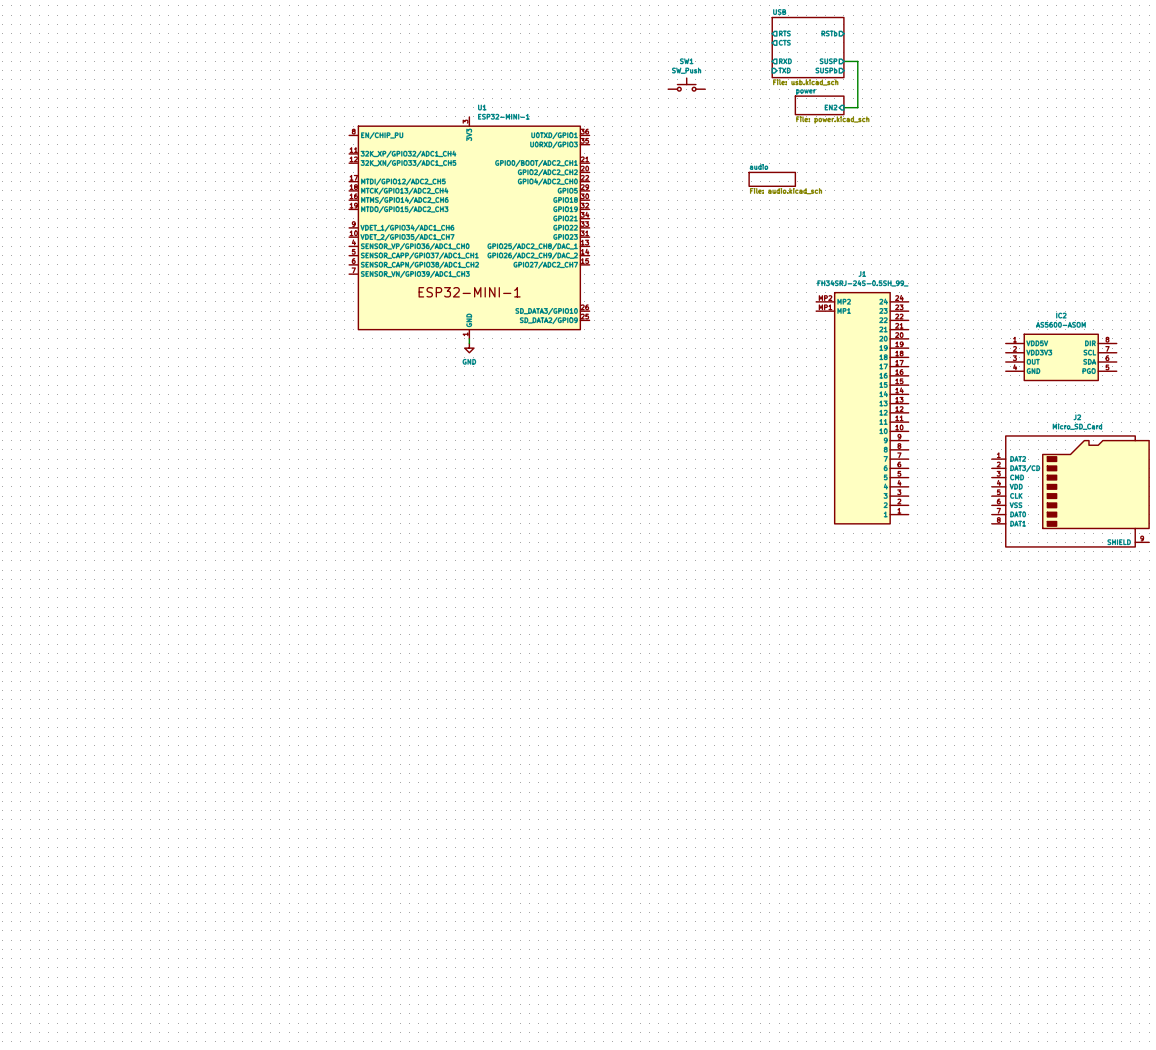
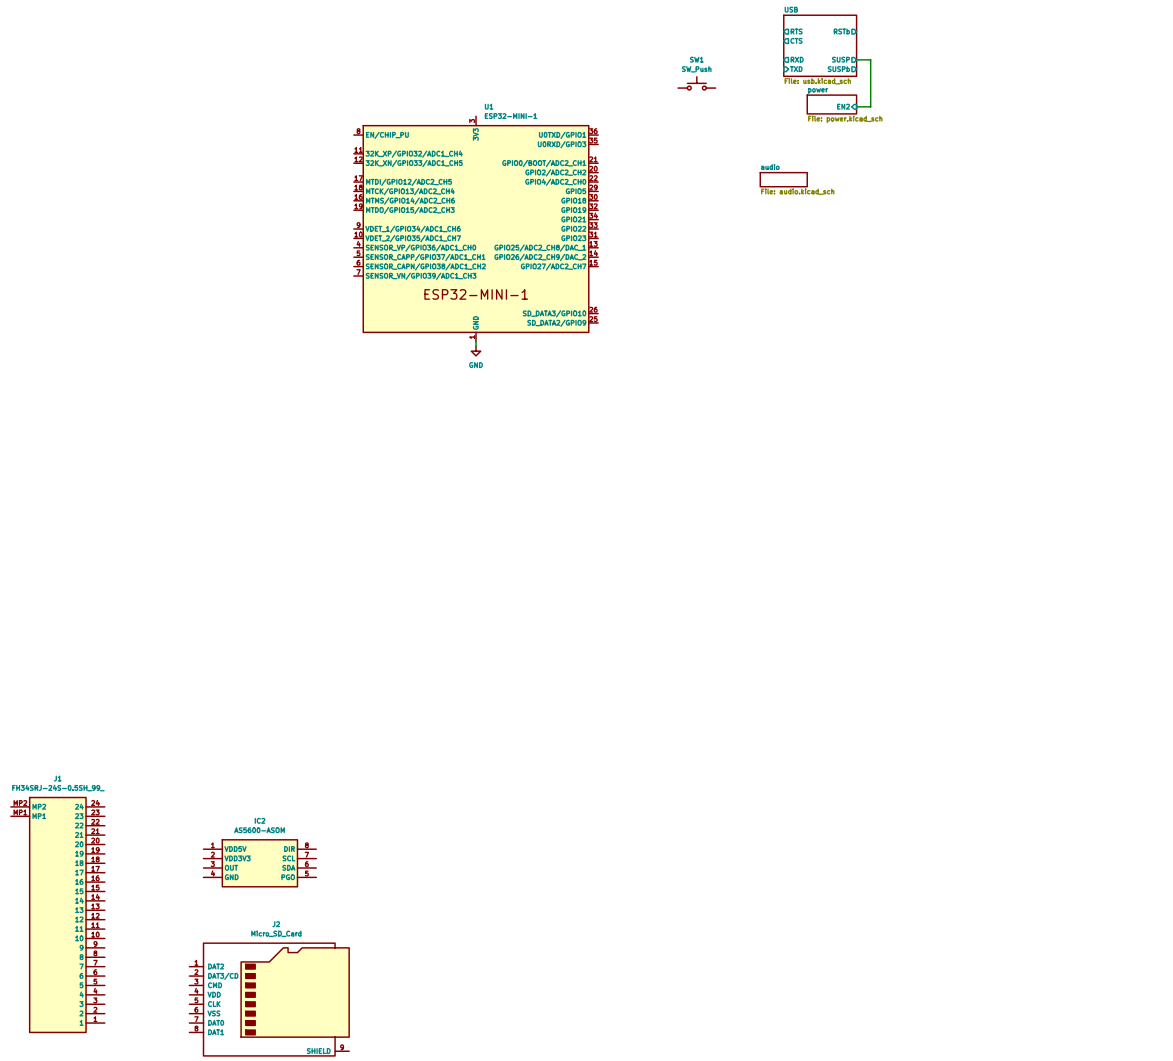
part position: (1061, 357) -> (259, 863)
part position: (862, 408) -> (57, 914)
part position: (1070, 491) -> (269, 999)

